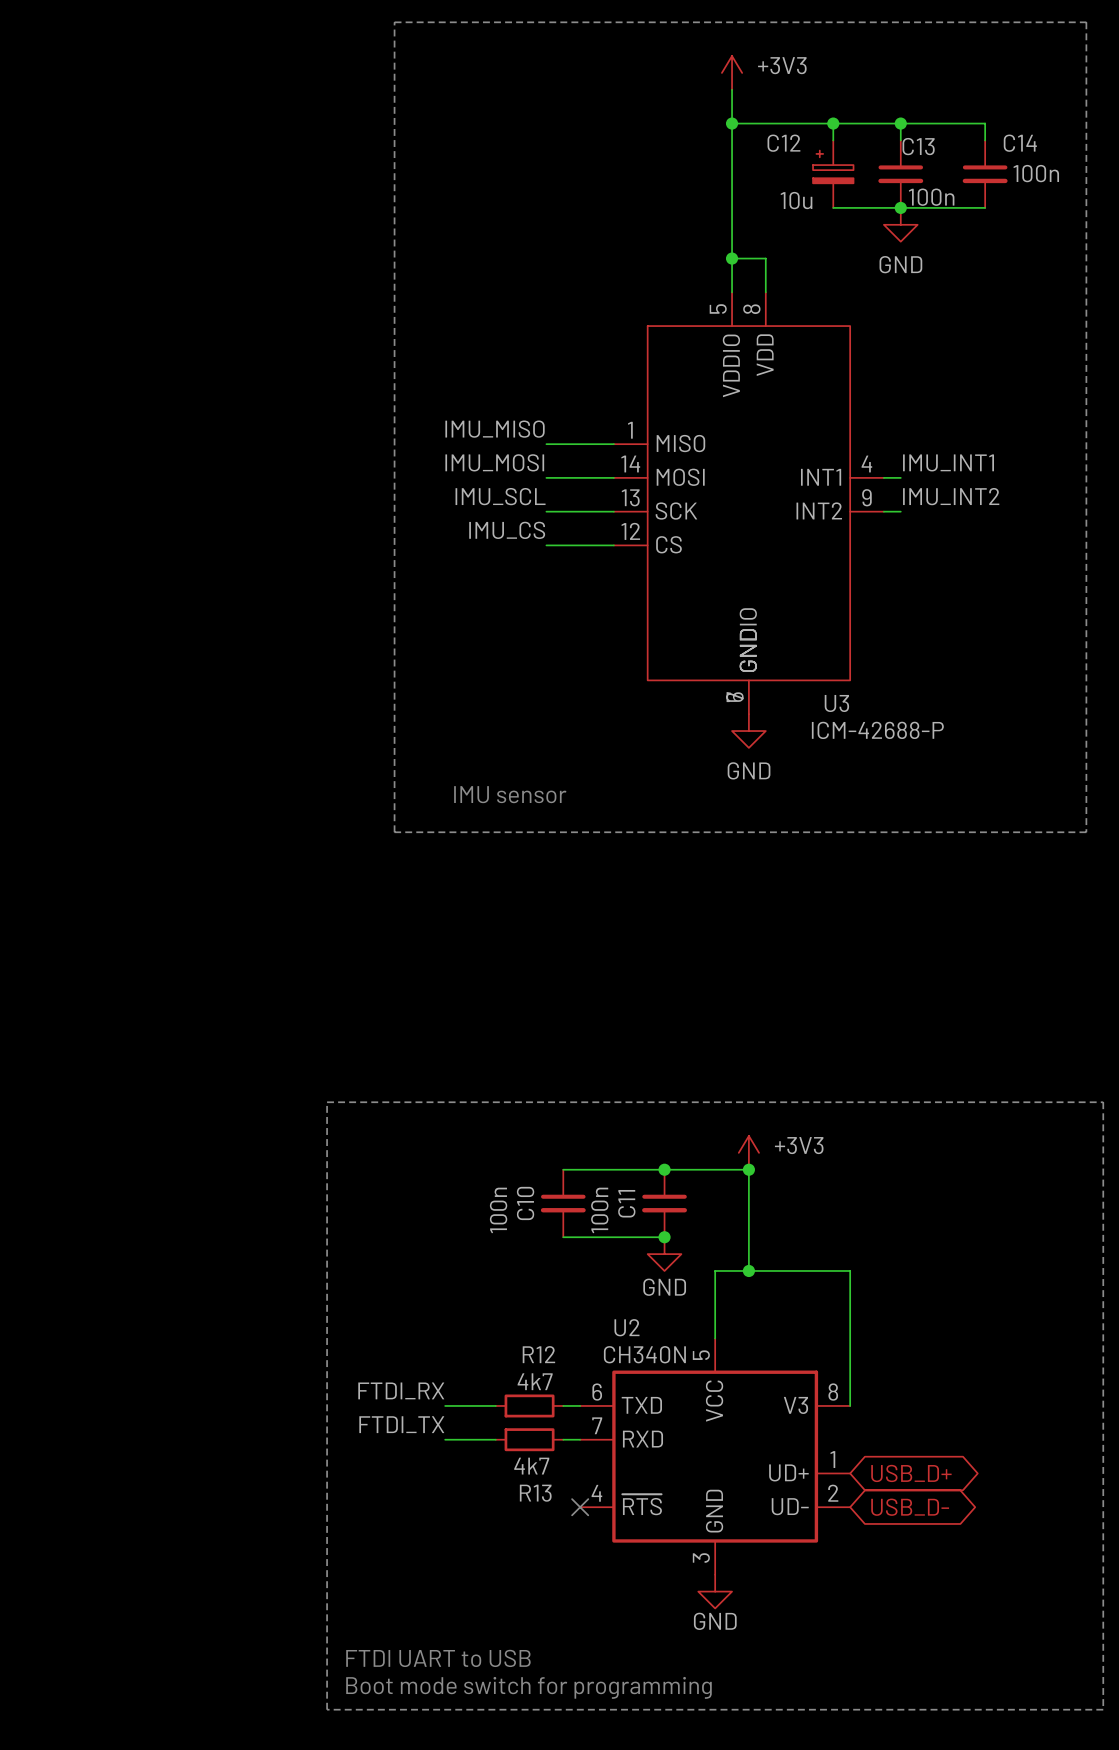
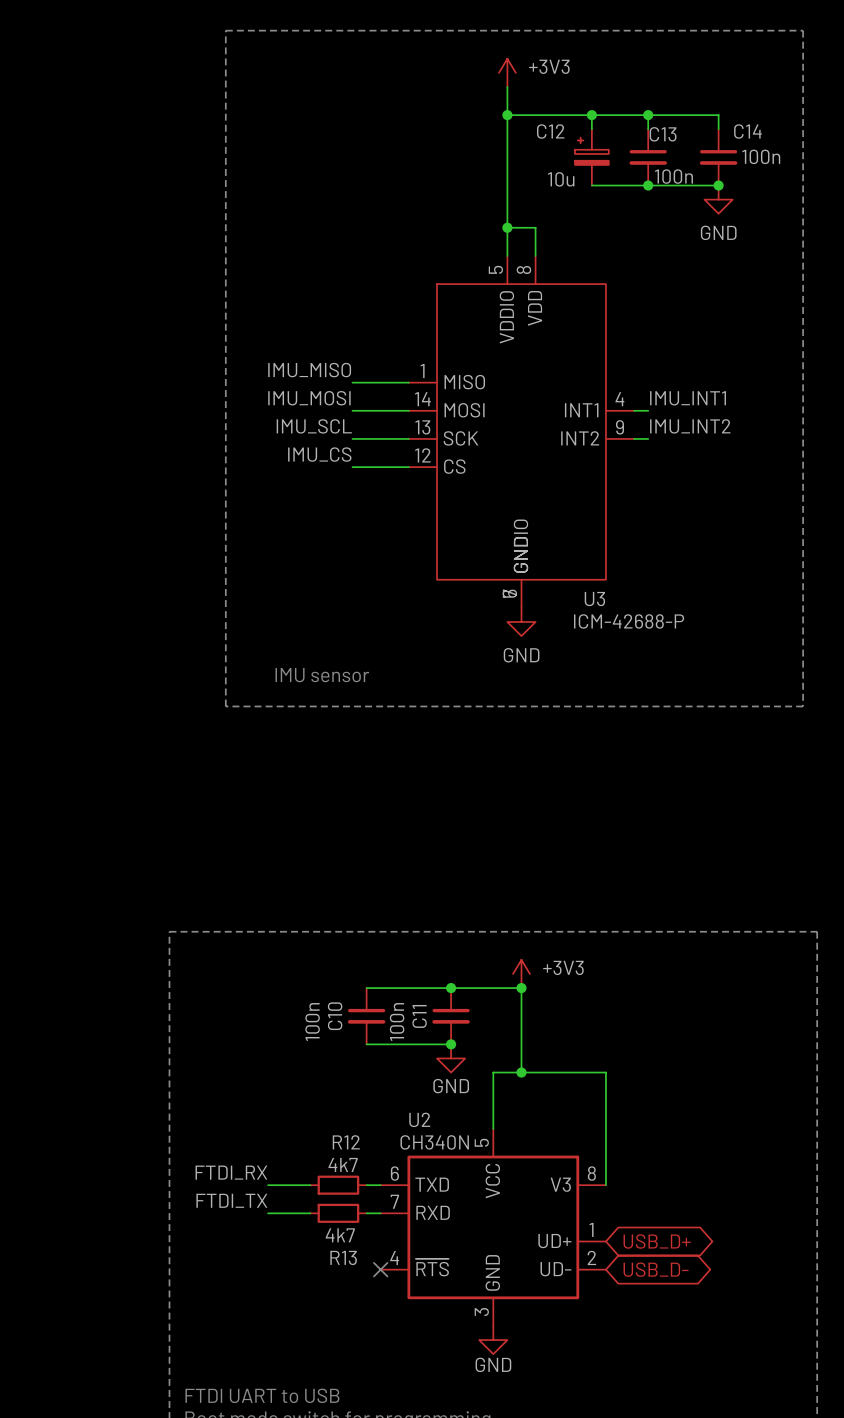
junction: none -> (718, 185)
power symbol position: GND (900, 224) -> GND (718, 199)

